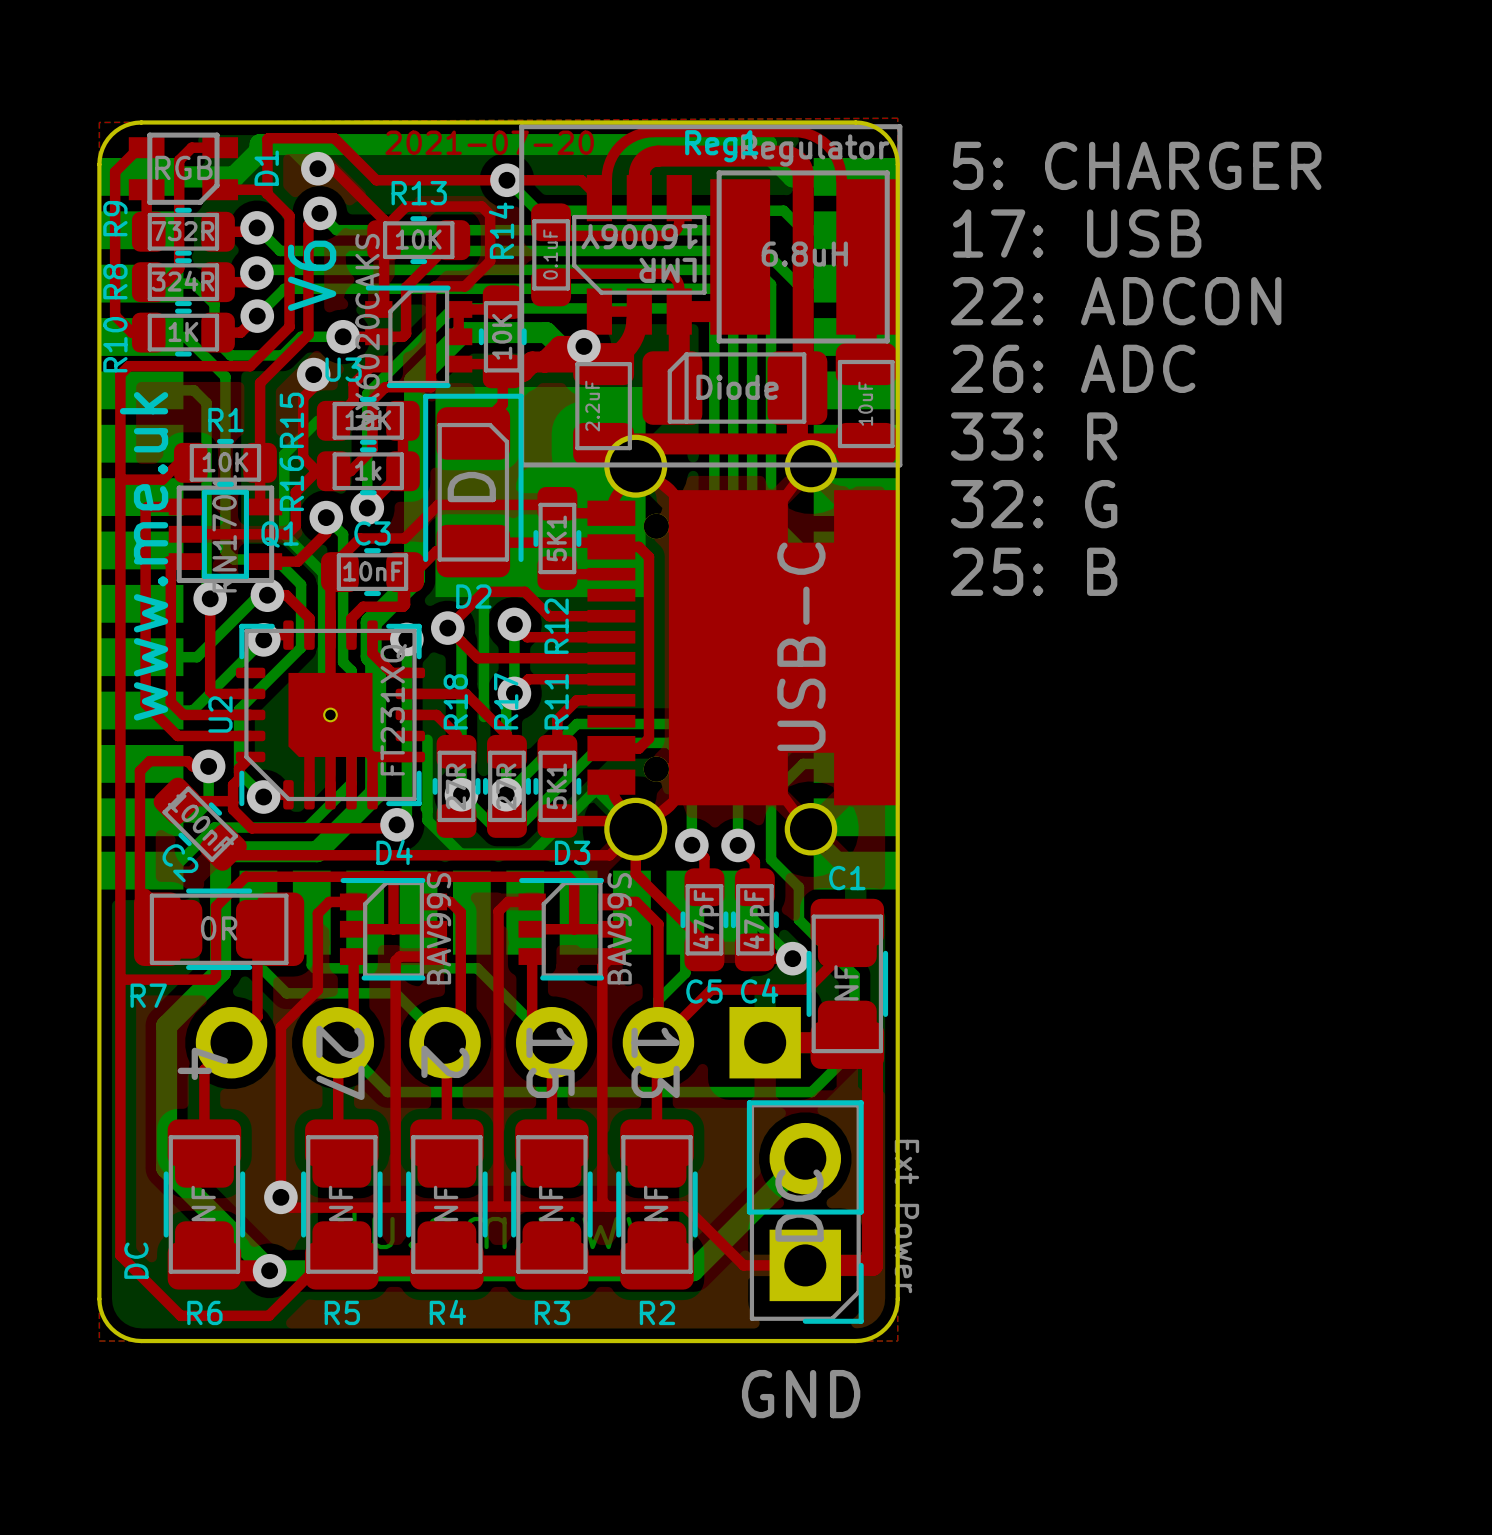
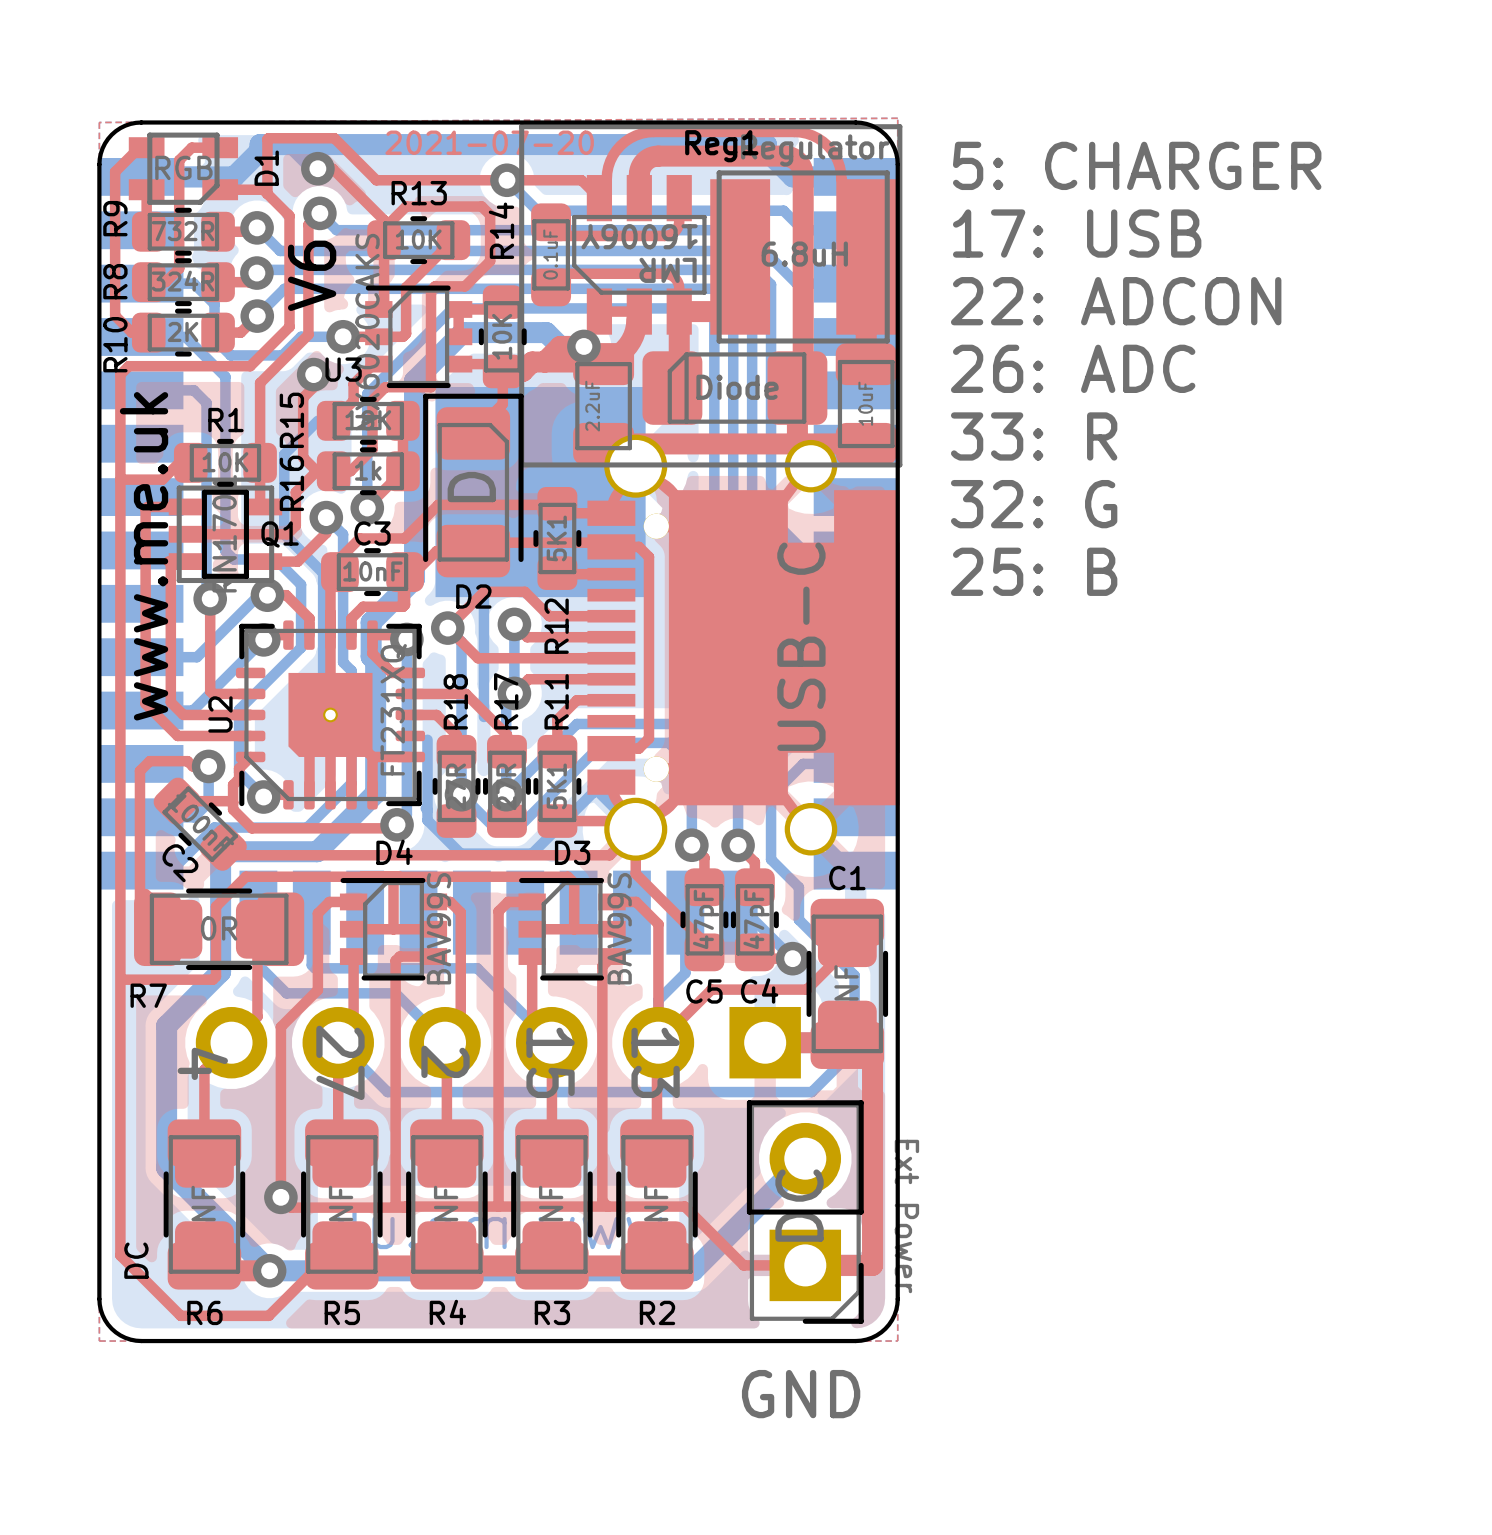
R10 value: 1K (183, 331) -> 2K (183, 331)

